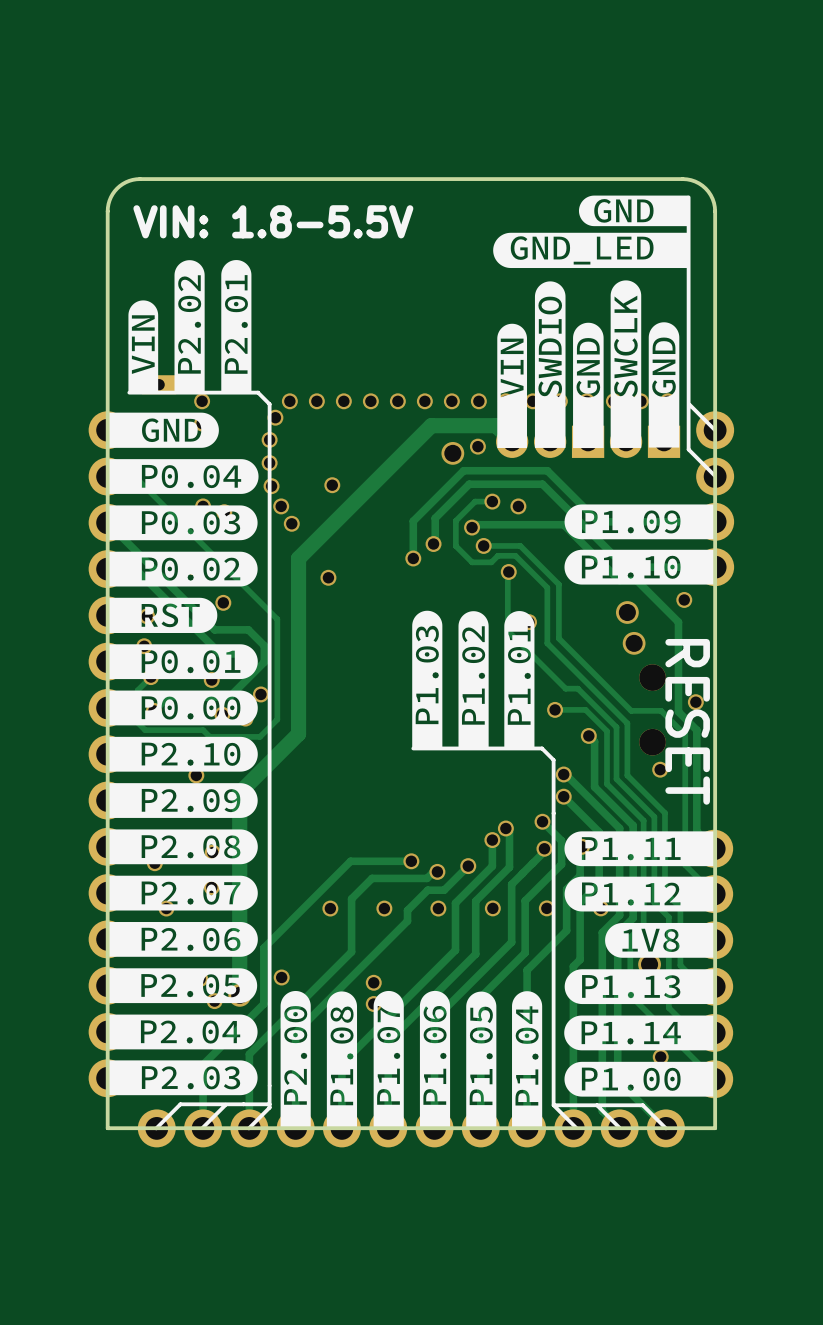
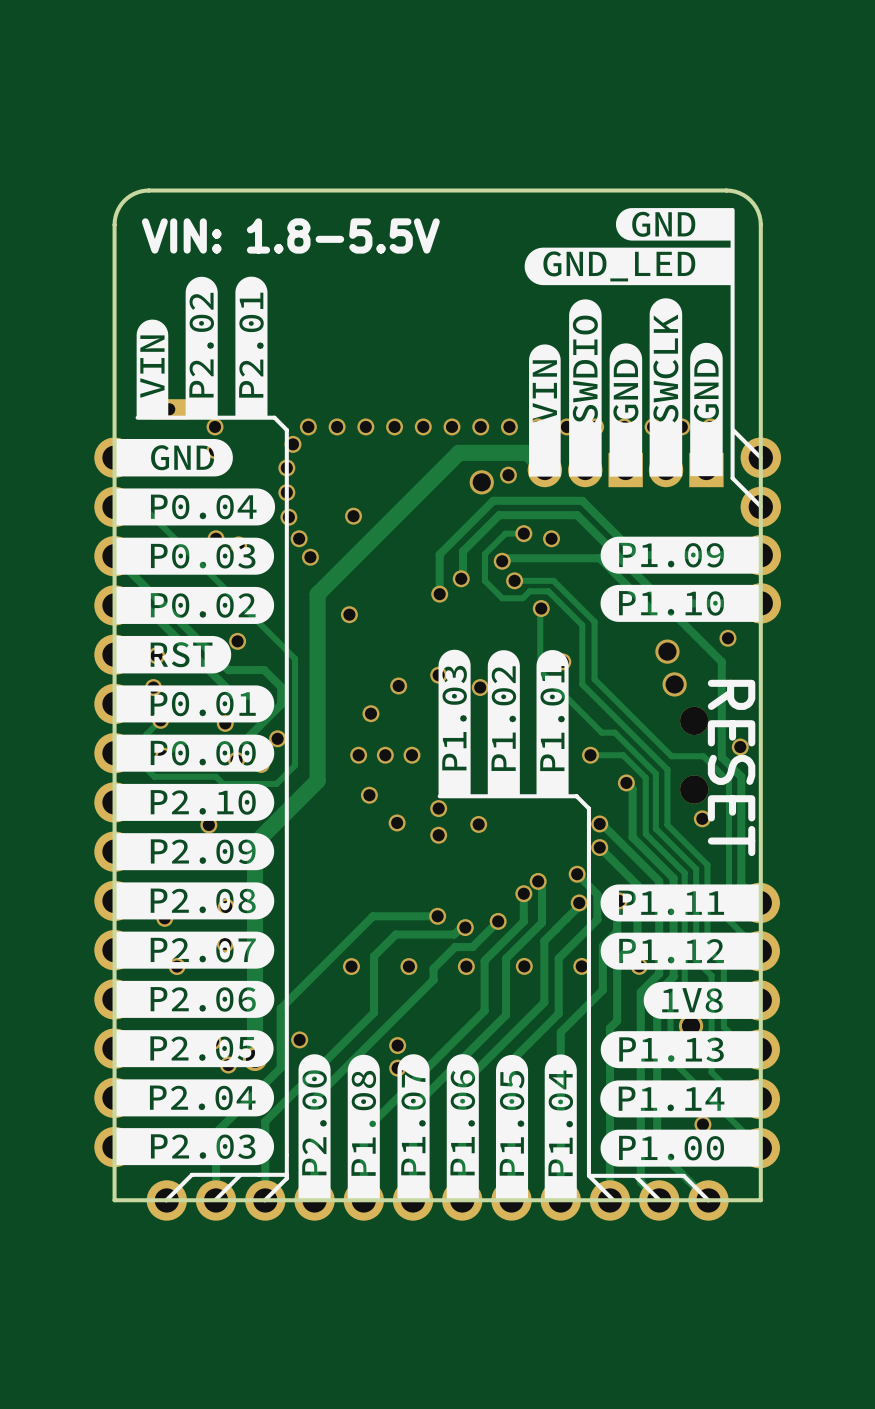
via: none -> (438, 675)
via: none -> (398, 685)
via: none -> (480, 687)
via: none -> (370, 713)
via: none -> (358, 755)
via: none -> (385, 755)
via: none -> (412, 755)
via: none -> (369, 795)
via: none -> (438, 808)
via: none -> (397, 822)
via: none -> (478, 824)
via: none -> (438, 835)

